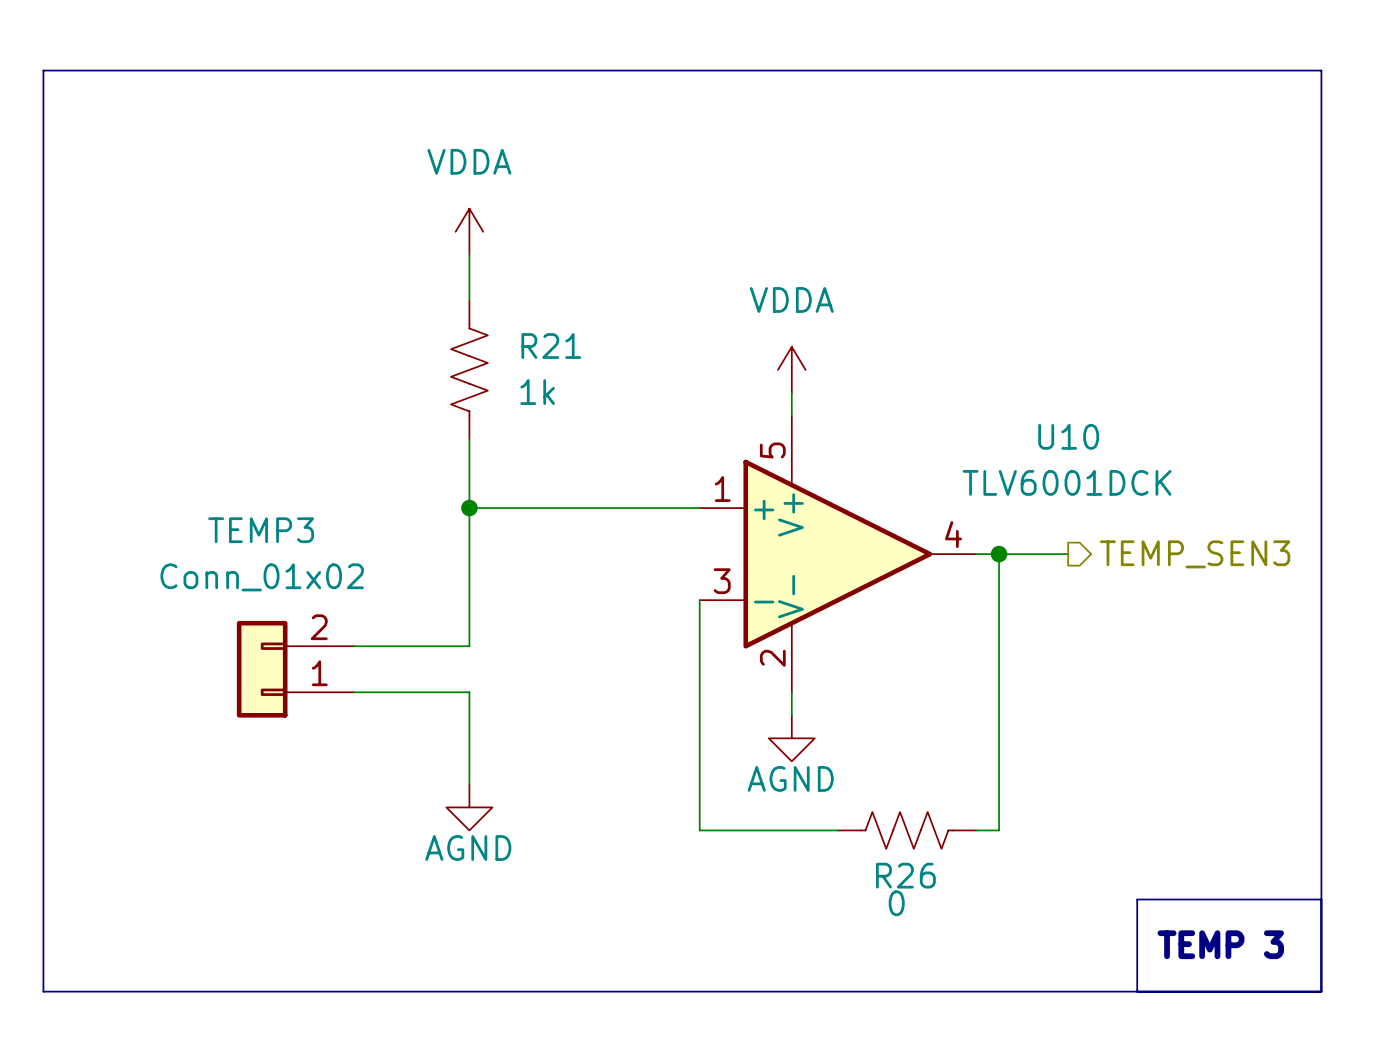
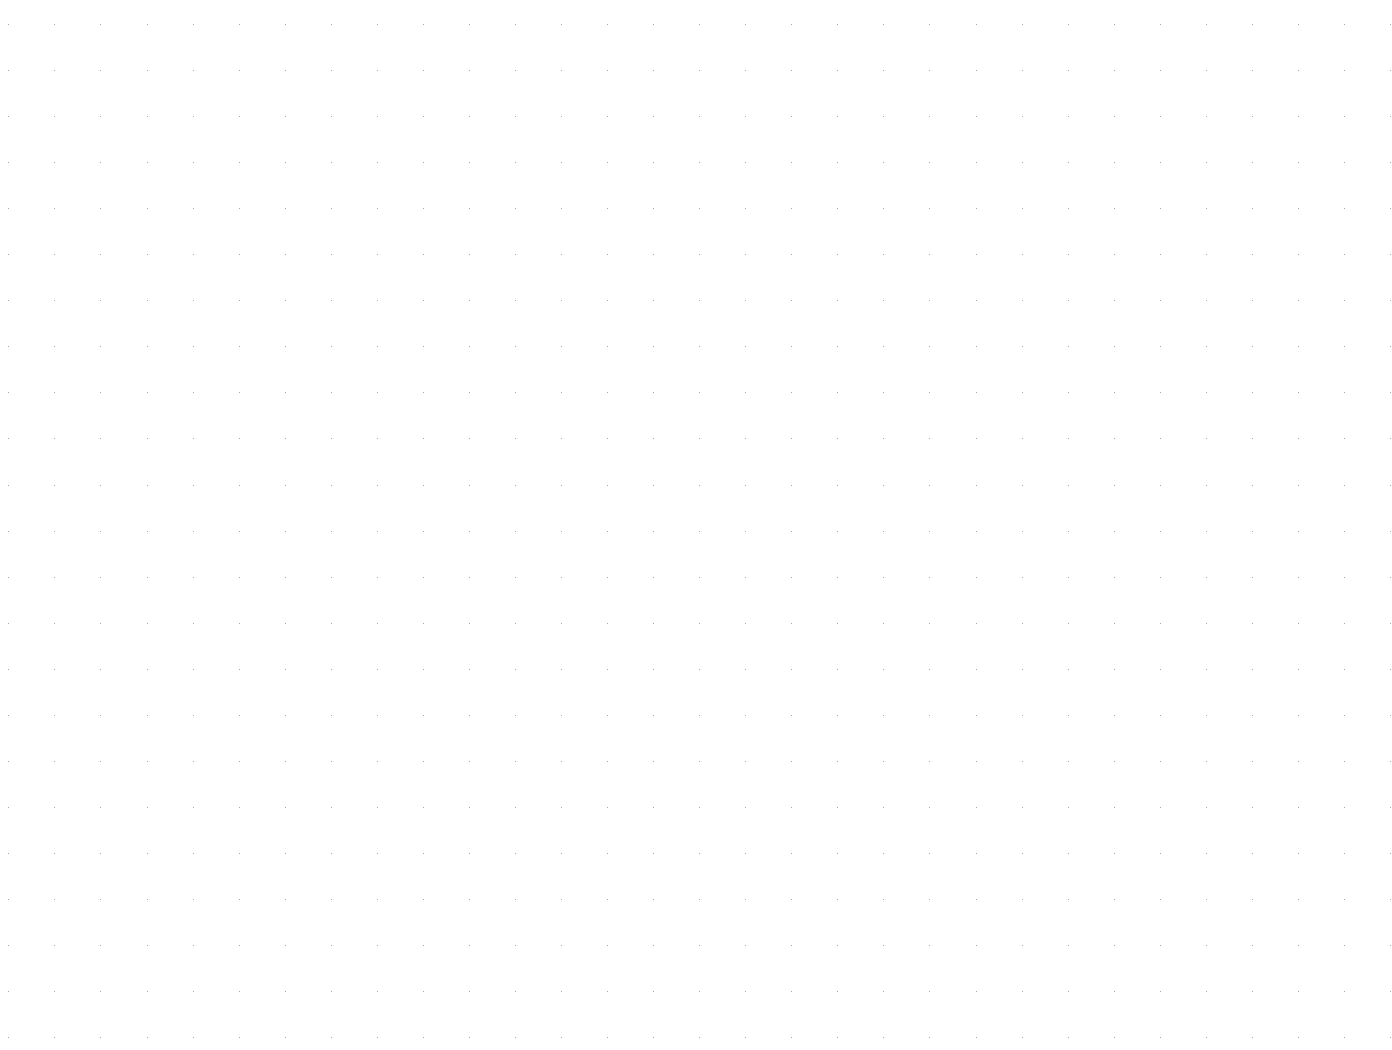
line: (43, 70) (1321, 70) (1321, 991) (43, 991) (43, 70) -> none
power symbol: VDDA (469, 231) -> none
wire: (469, 254) (469, 300) -> none
R21: 1k (469, 369) -> none
power symbol: VDDA (791, 369) -> none
wire: (791, 392) (791, 415) -> none
wire: (469, 438) (469, 646) (354, 646) -> none
wire: (469, 508) (699, 508) -> none
junction: (469, 508) -> none
U10: TLV6001DCK (837, 554) -> none
wire: (976, 554) (1068, 554) -> none
wire: (999, 554) (999, 830) (976, 830) -> none
junction: (999, 554) -> none
hierarchical label: TEMP_SEN3 (1195, 554) -> none
wire: (699, 600) (699, 830) (837, 830) -> none
TEMP3: Conn_01x02 (295, 669) -> none
wire: (354, 692) (469, 692) (469, 784) -> none
wire: (791, 692) (791, 715) -> none
power symbol: AGND (791, 738) -> none
power symbol: AGND (469, 807) -> none
R26: 0 (906, 830) -> none
line: (1321, 899) (1137, 899) (1137, 991) -> none
text: TEMP 3 (1220, 944) -> none

